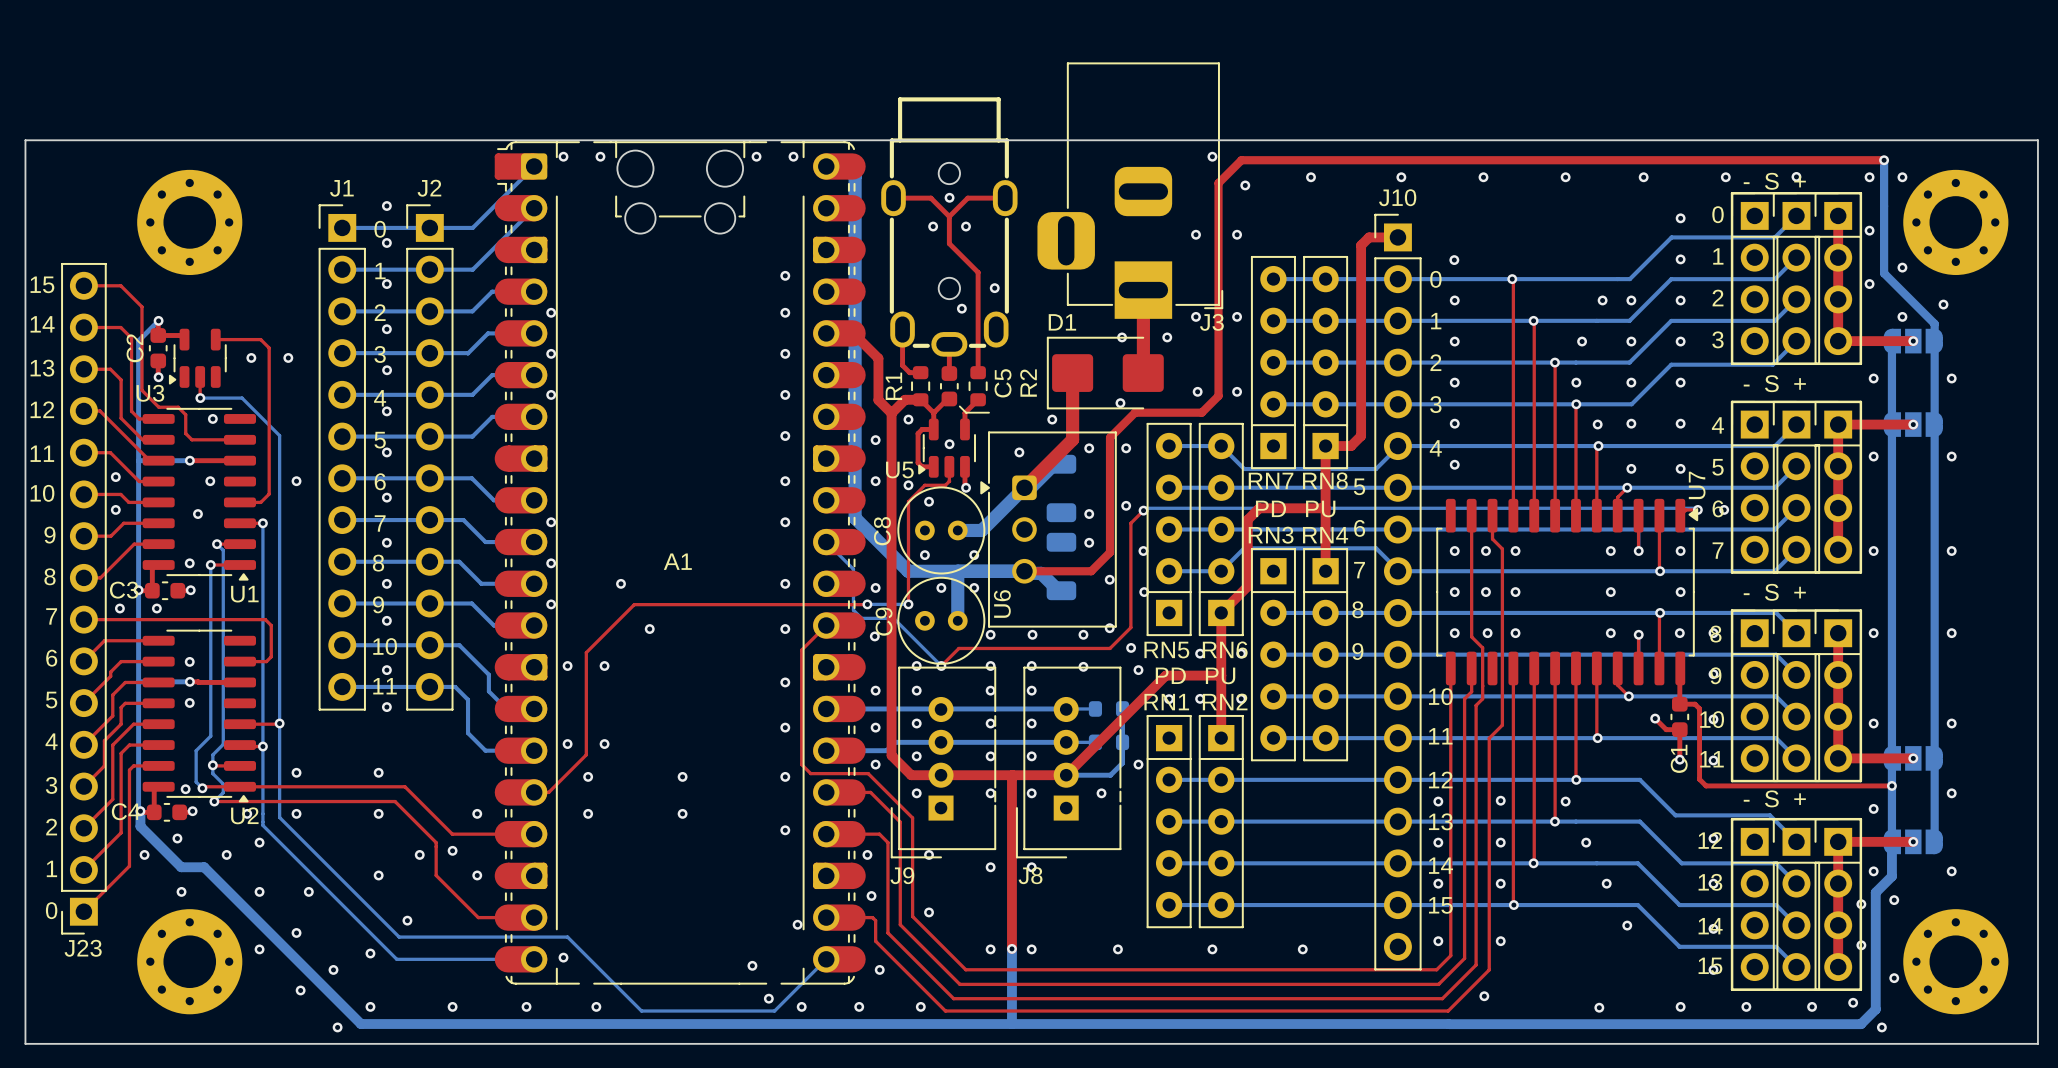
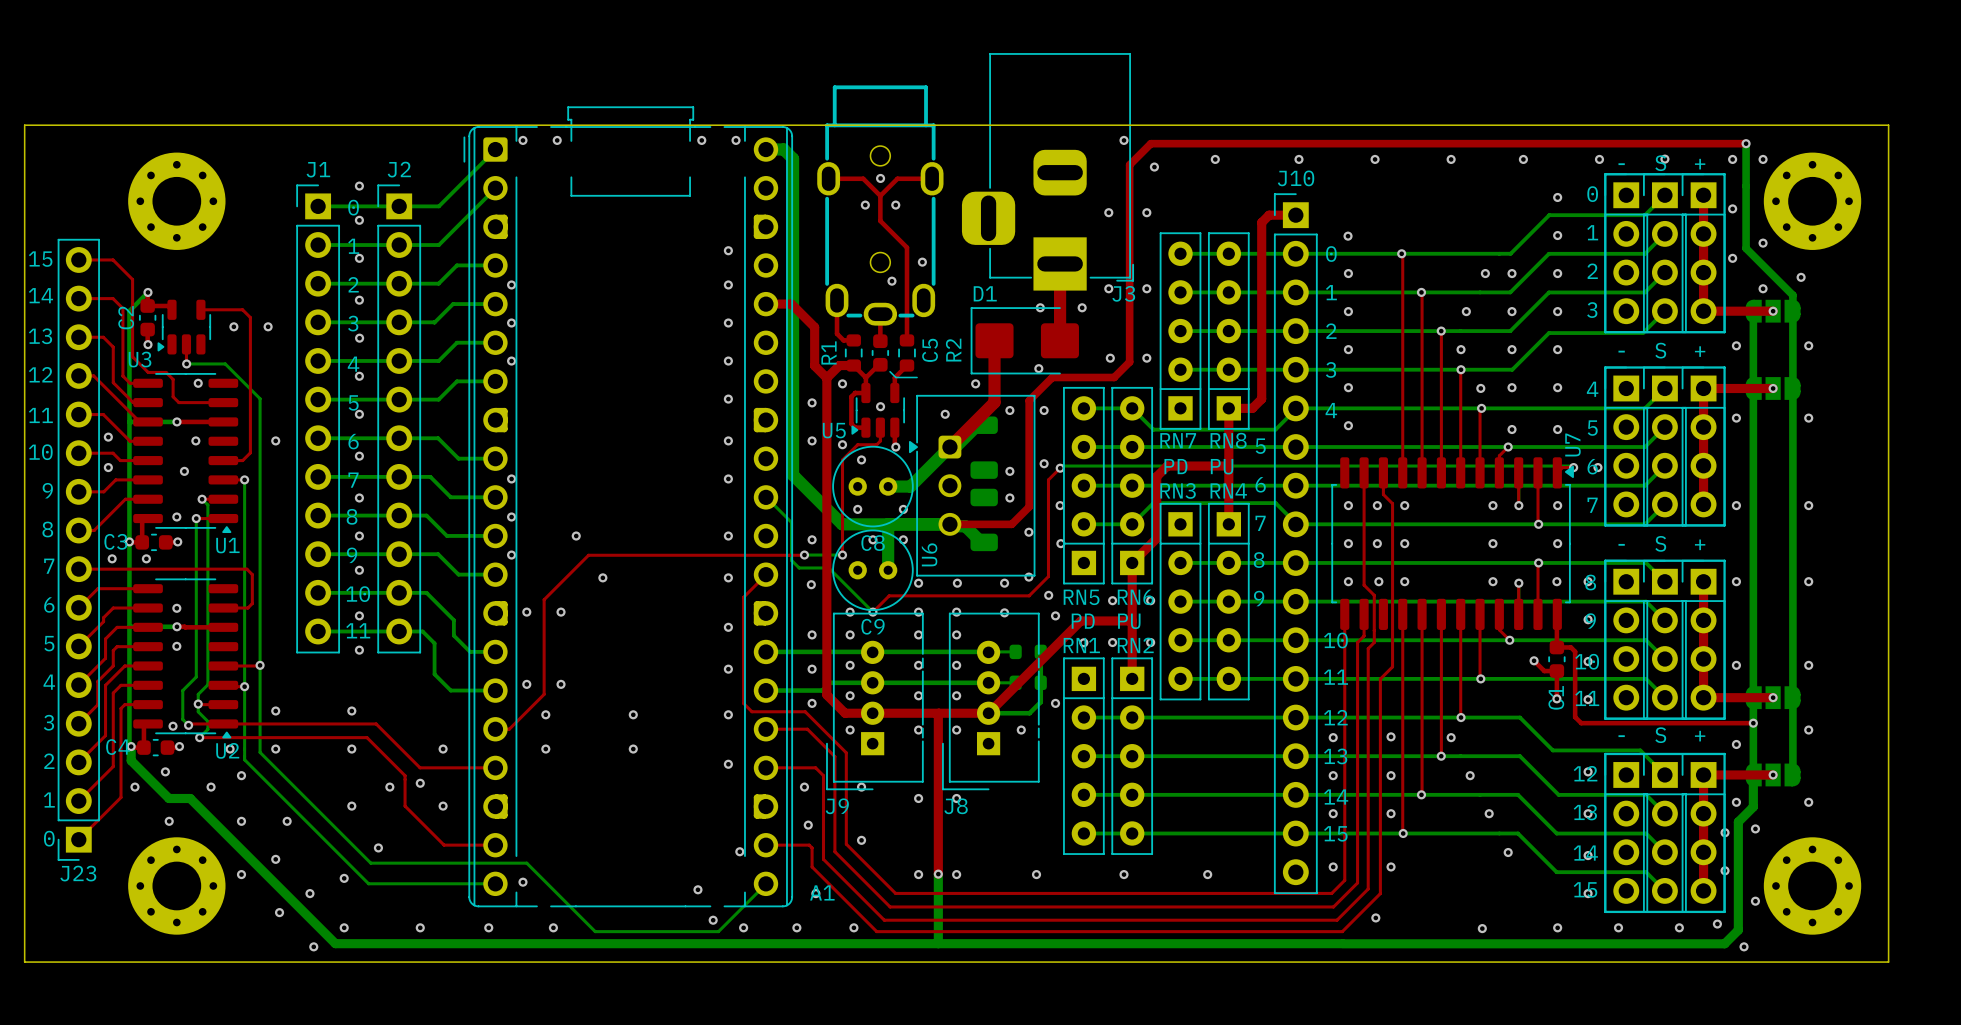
A1 footprint: [494, 141, 866, 985] -> [463, 106, 794, 908]
C8 name rotation: 0° (882, 531) -> 90° clockwise (873, 543)
C8 name position: C8 (882, 531) -> C8 (873, 543)
A1 name position: A1 (677, 561) -> A1 (822, 892)
C9 name rotation: 0° (884, 621) -> 90° clockwise (873, 626)
C9 name position: C9 (884, 621) -> C9 (873, 626)

